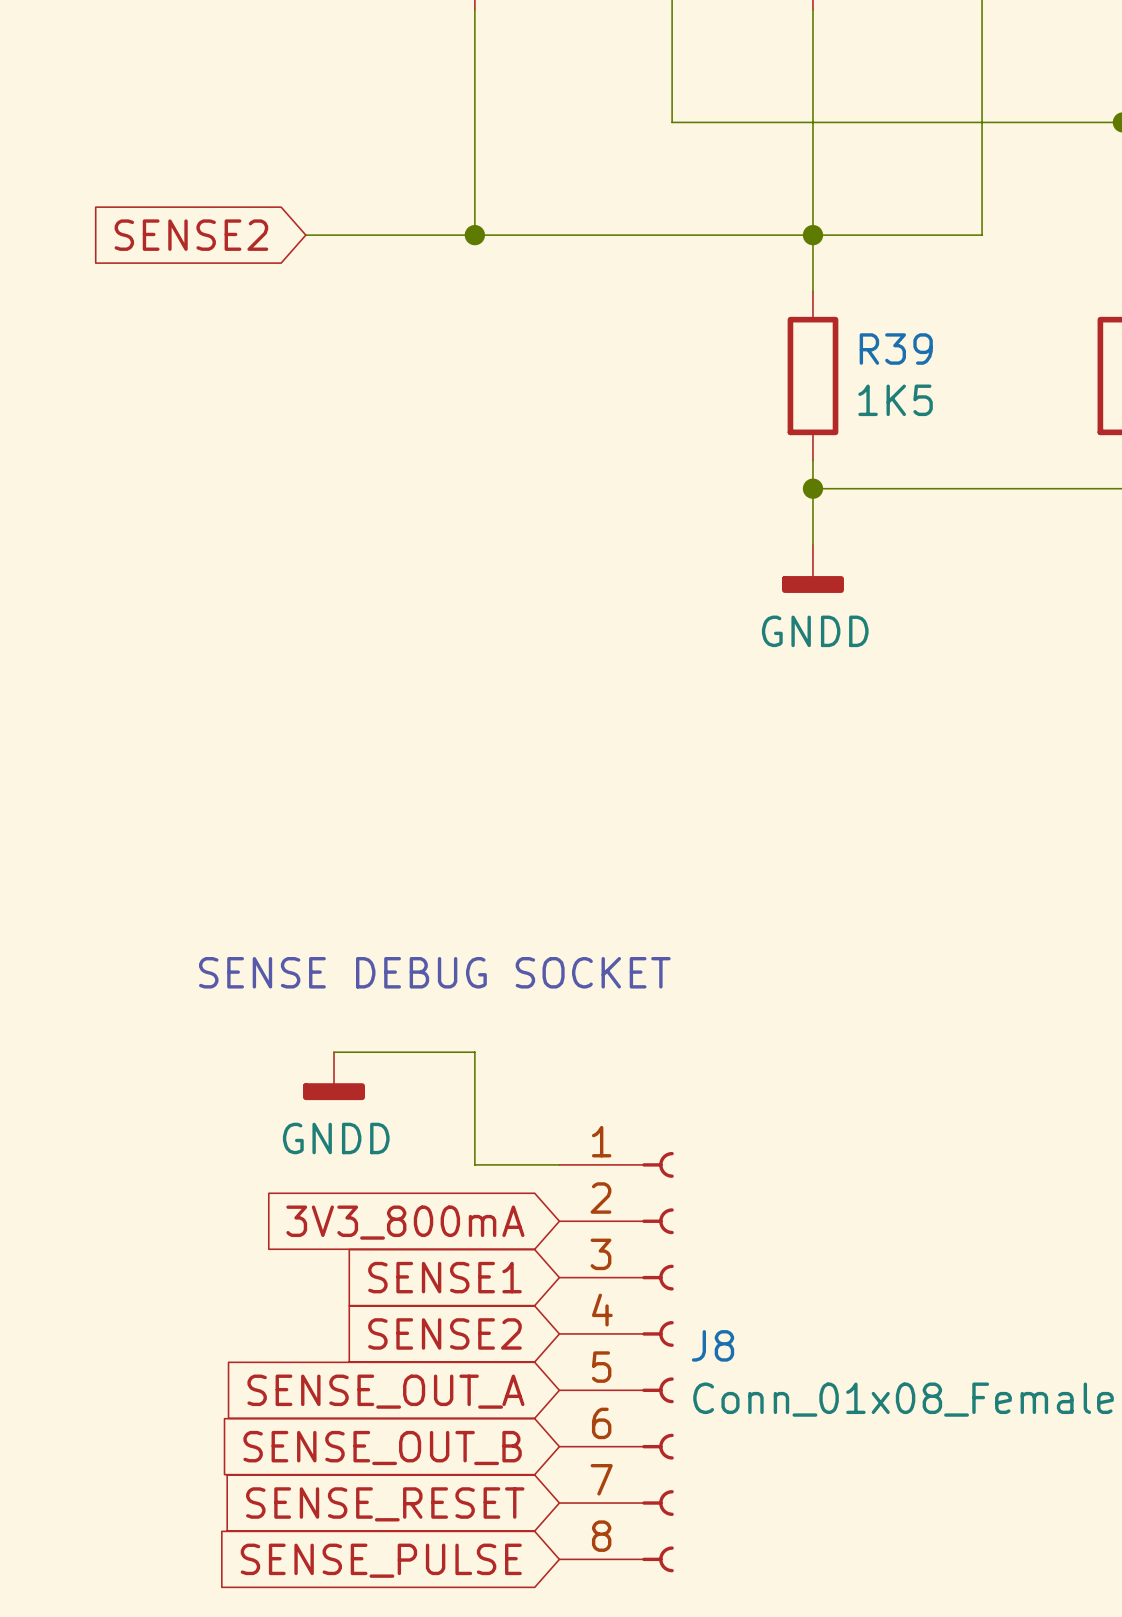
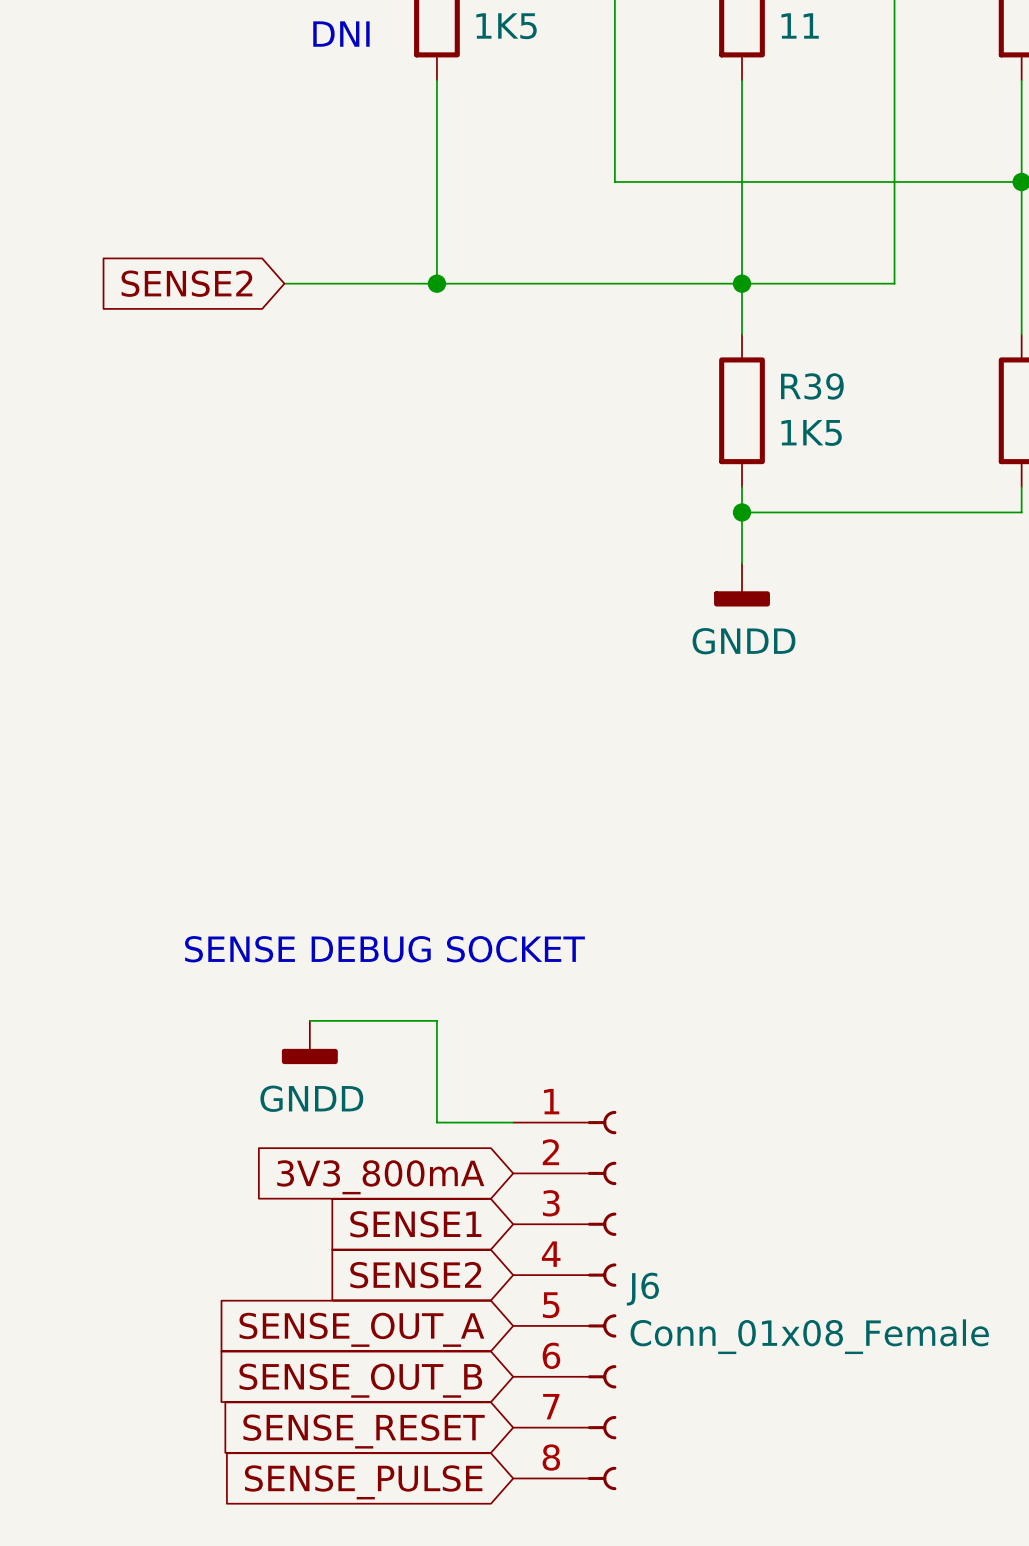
J8 name: J8 (713, 1345) -> J6 (642, 1289)

